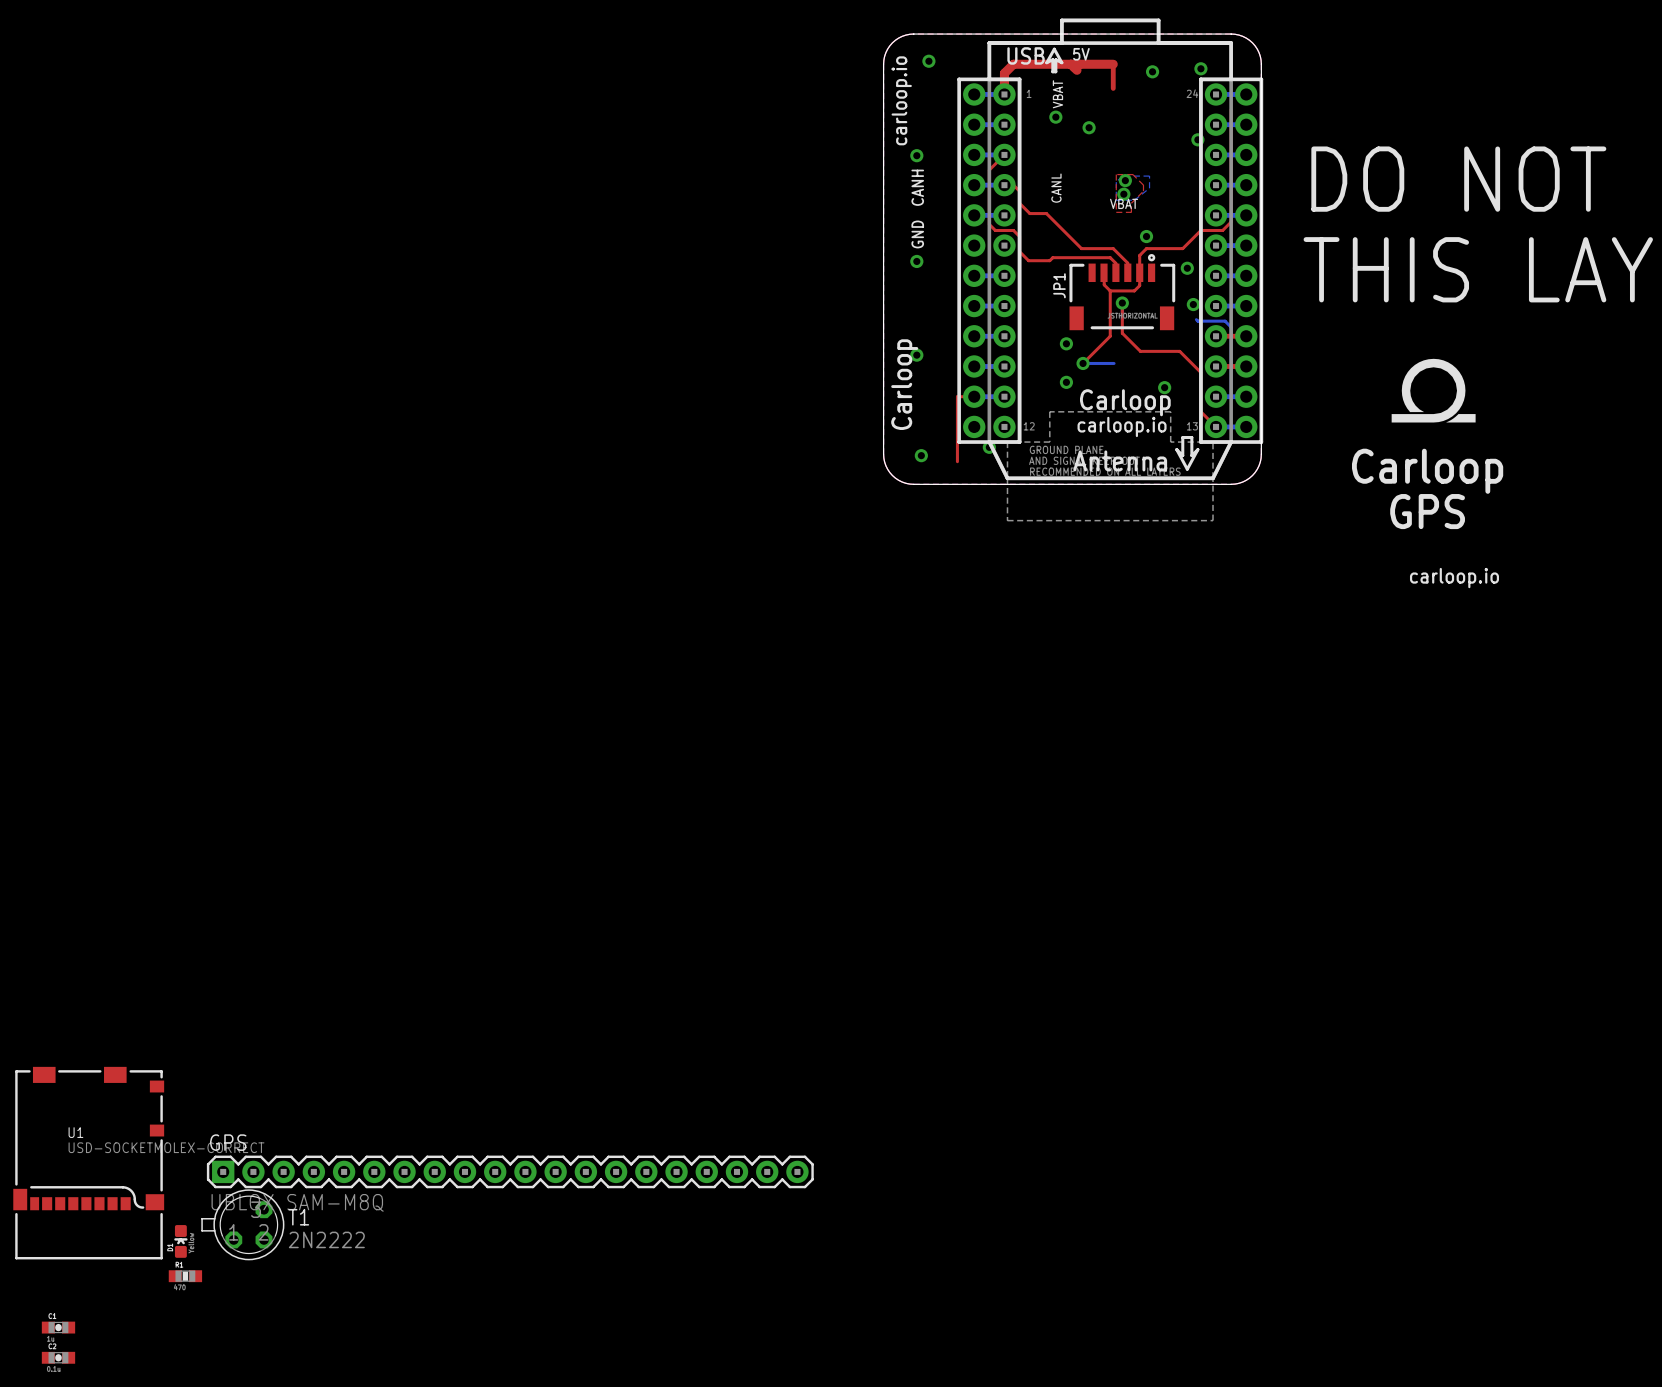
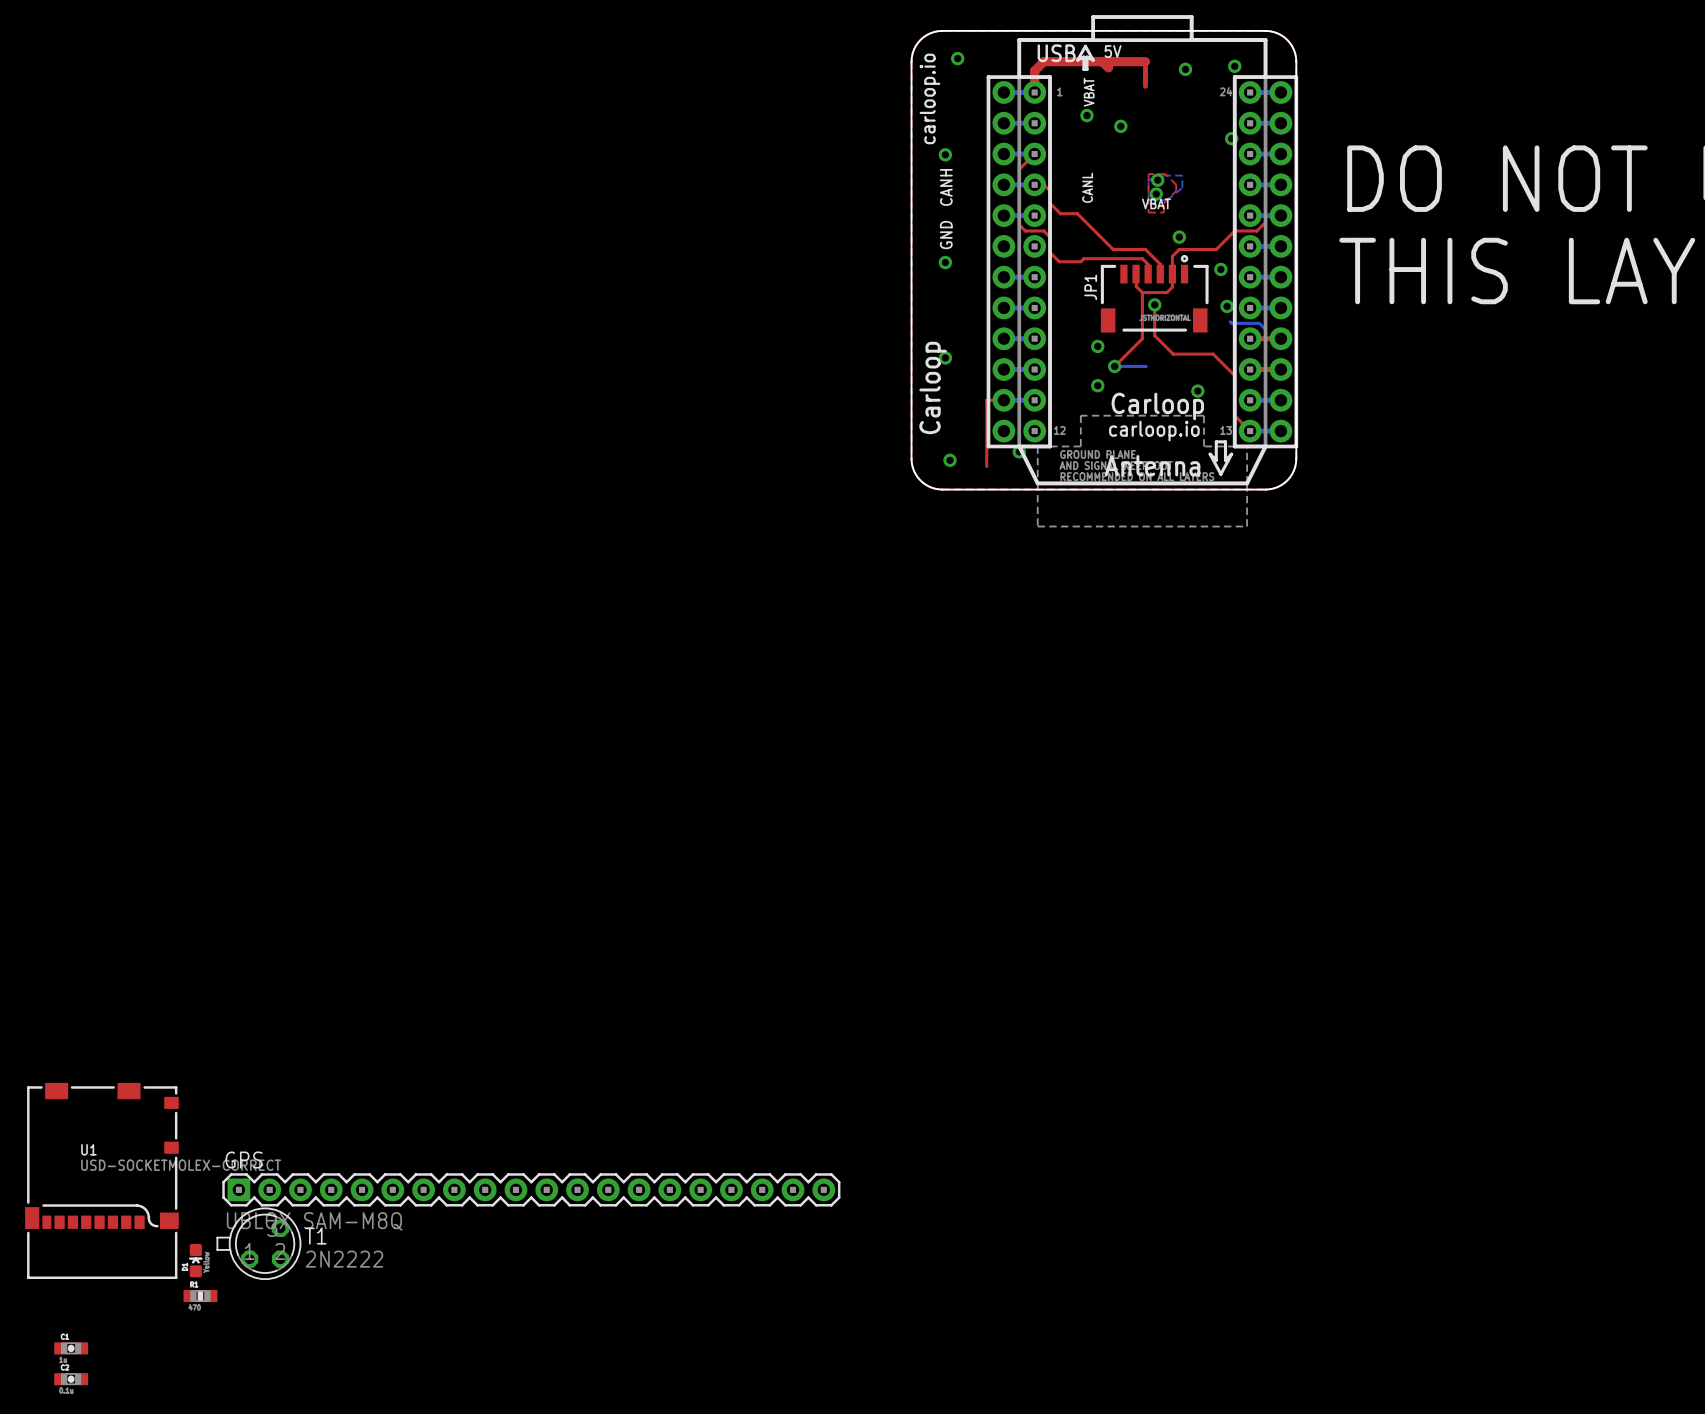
drawing: [1391, 358, 1476, 423] -> none
text: Carloop (1427, 471) -> none
text: GPS (1427, 511) -> none
text: carloop.io (1454, 578) -> none

